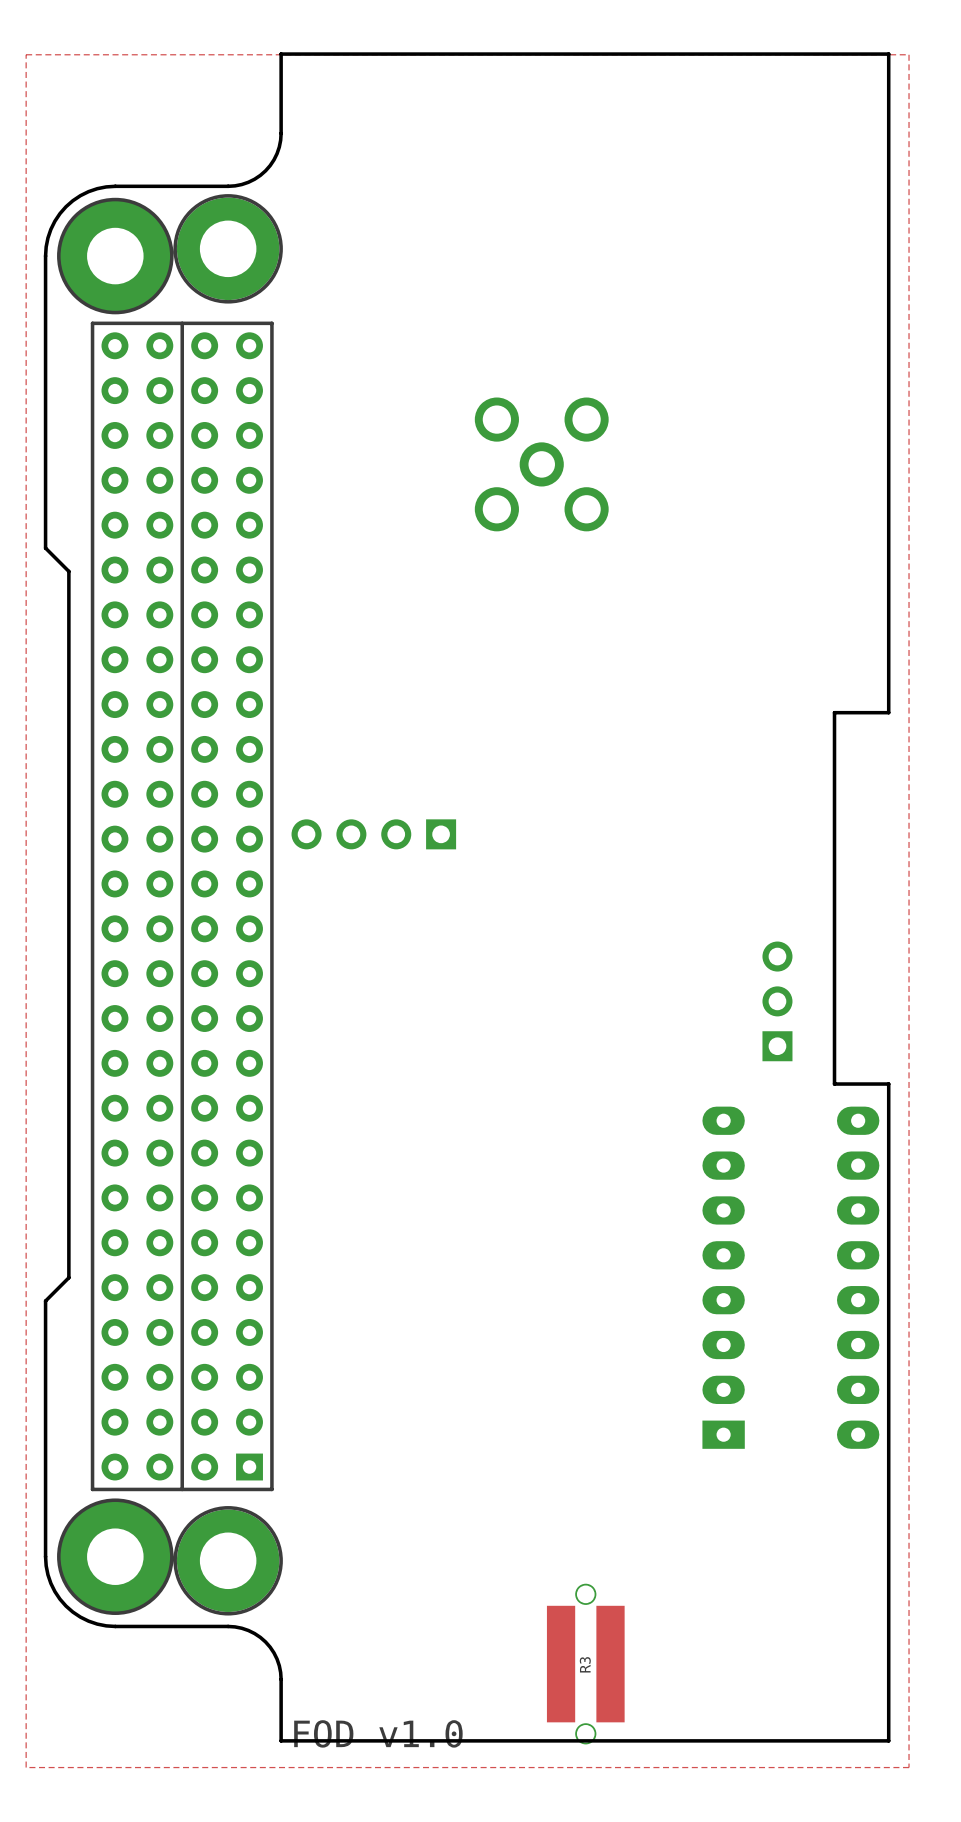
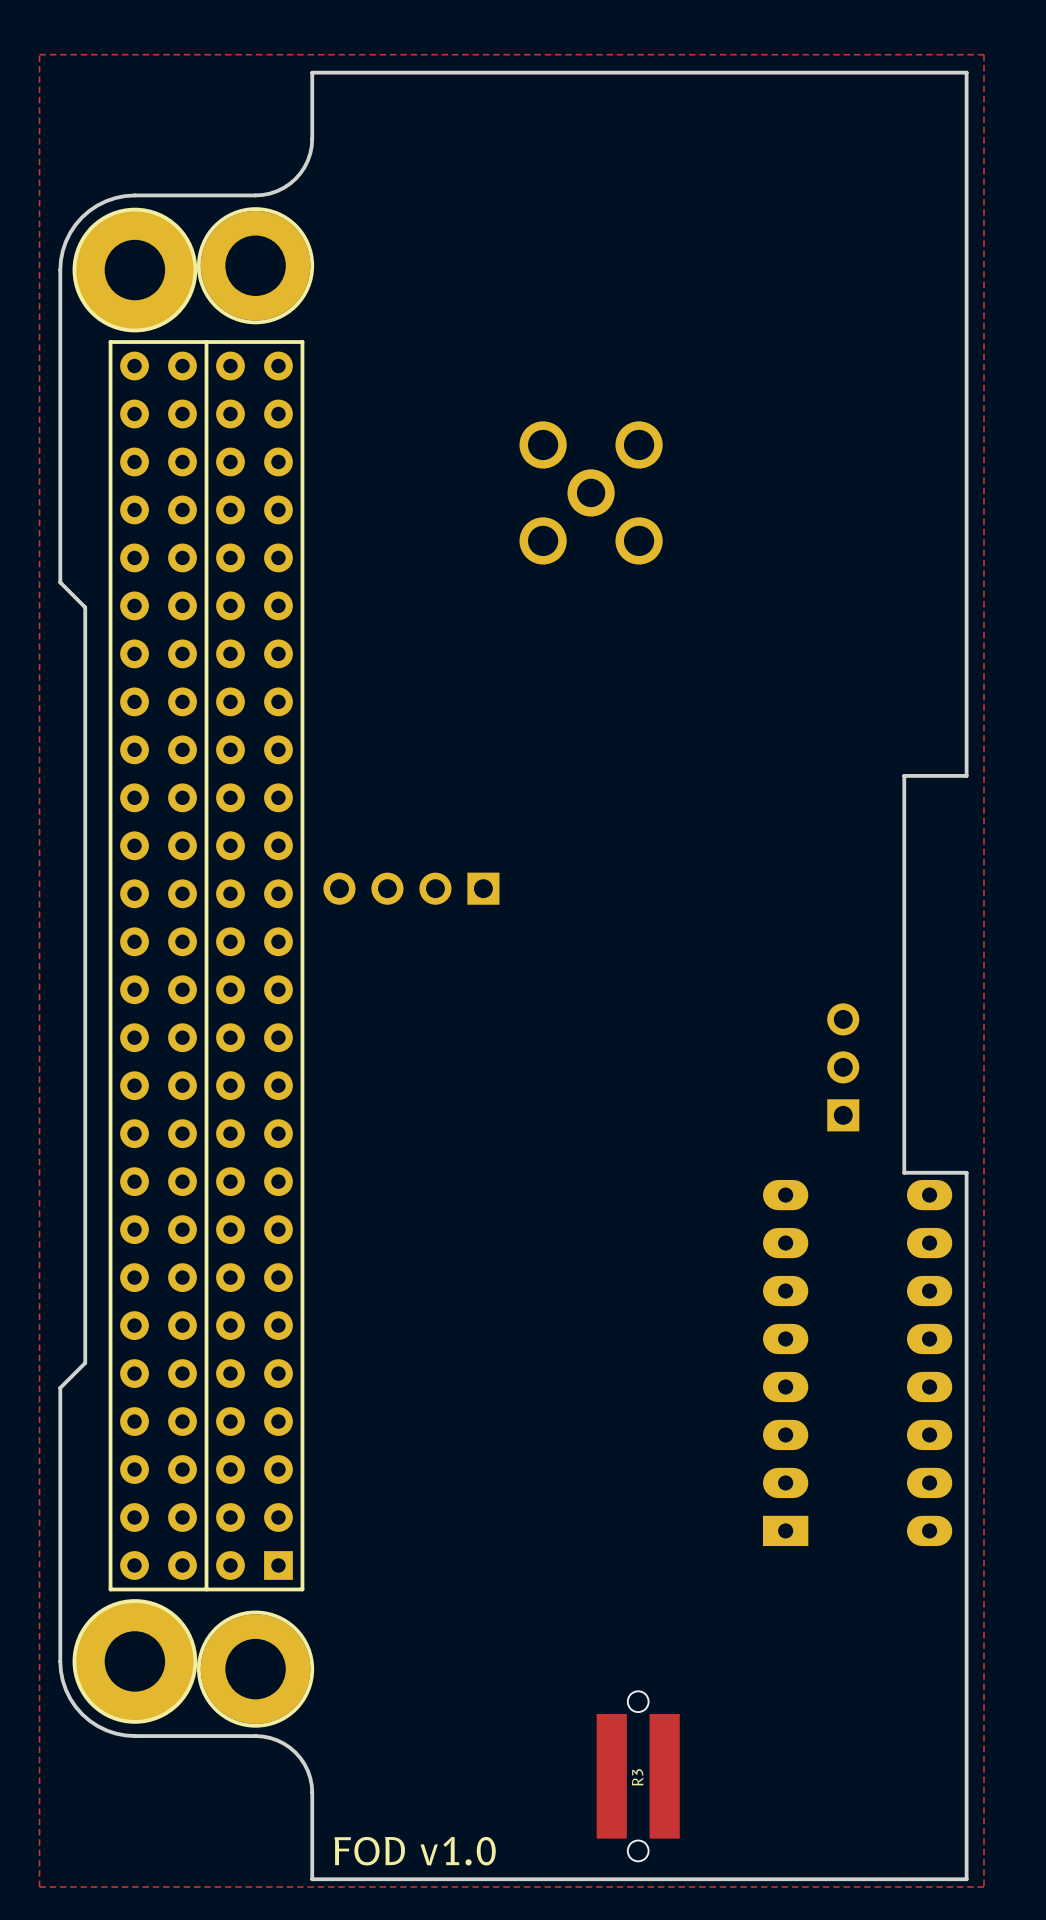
part: (467, 897) -> none
part: none -> (513, 975)

